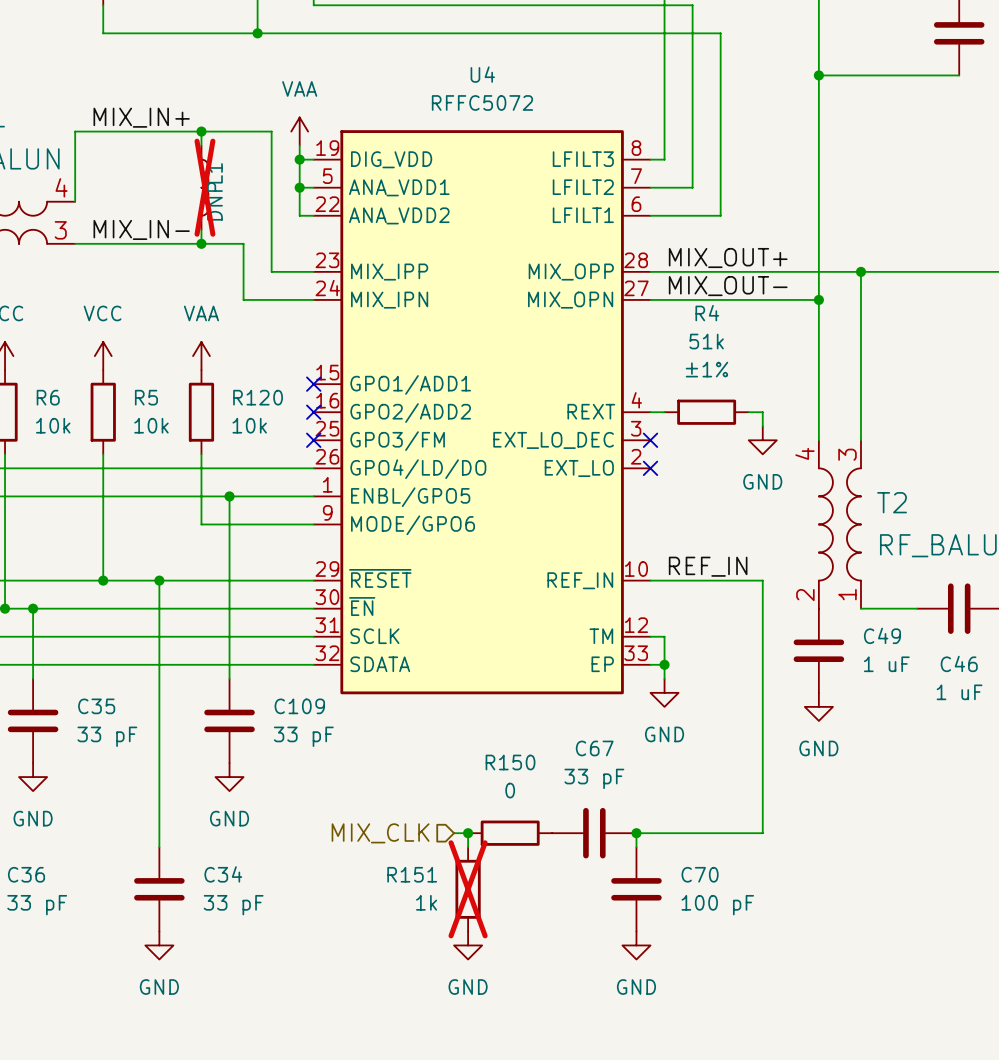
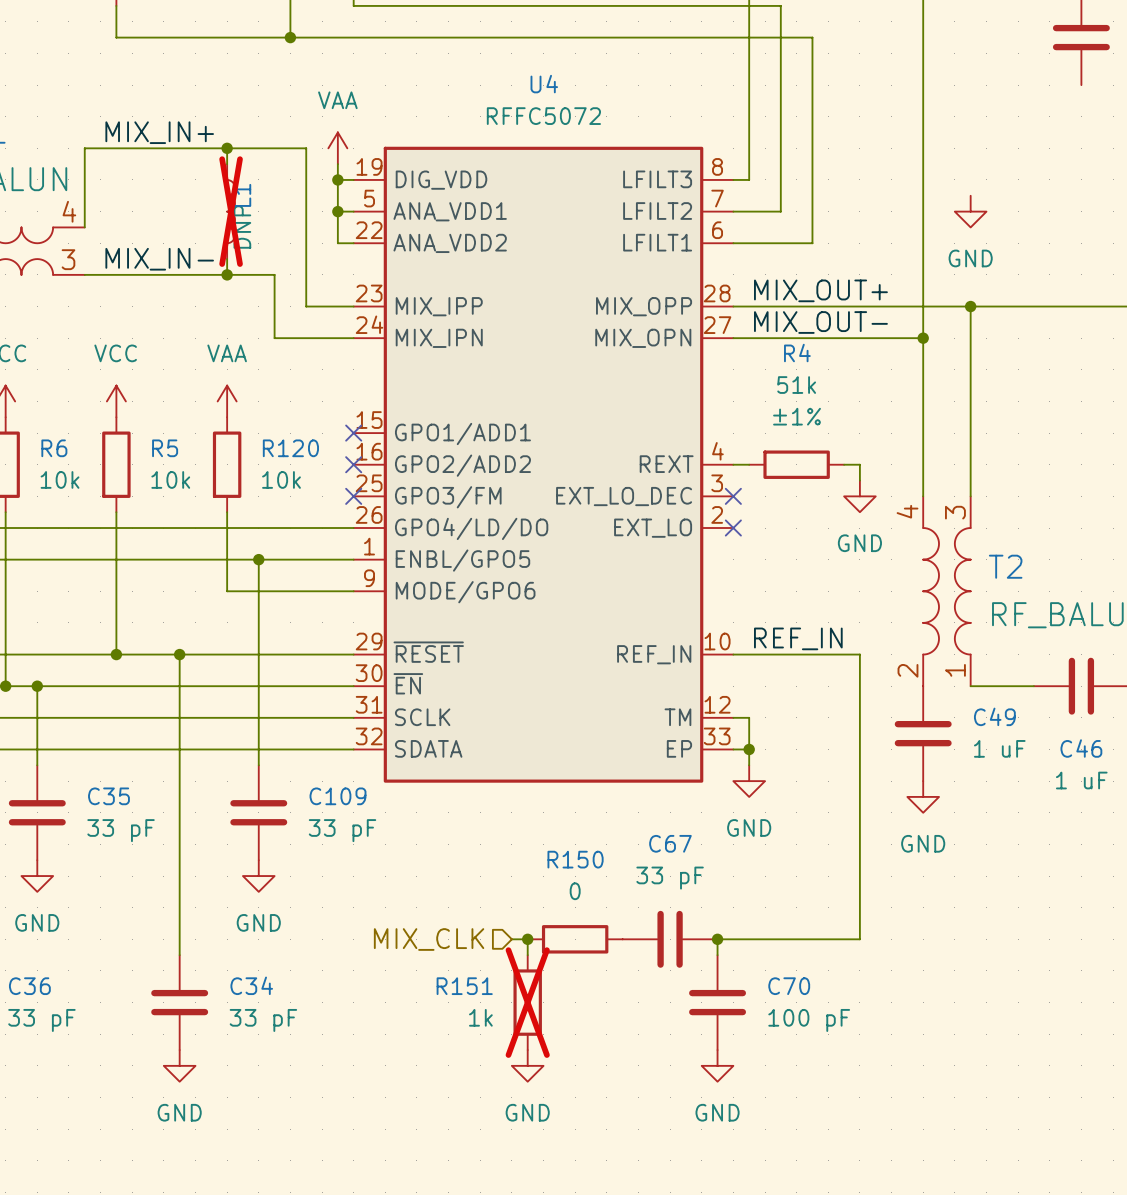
wire: (818, 75) (959, 75) -> none
junction: (818, 75) -> none
power symbol: none -> GND (970, 211)

